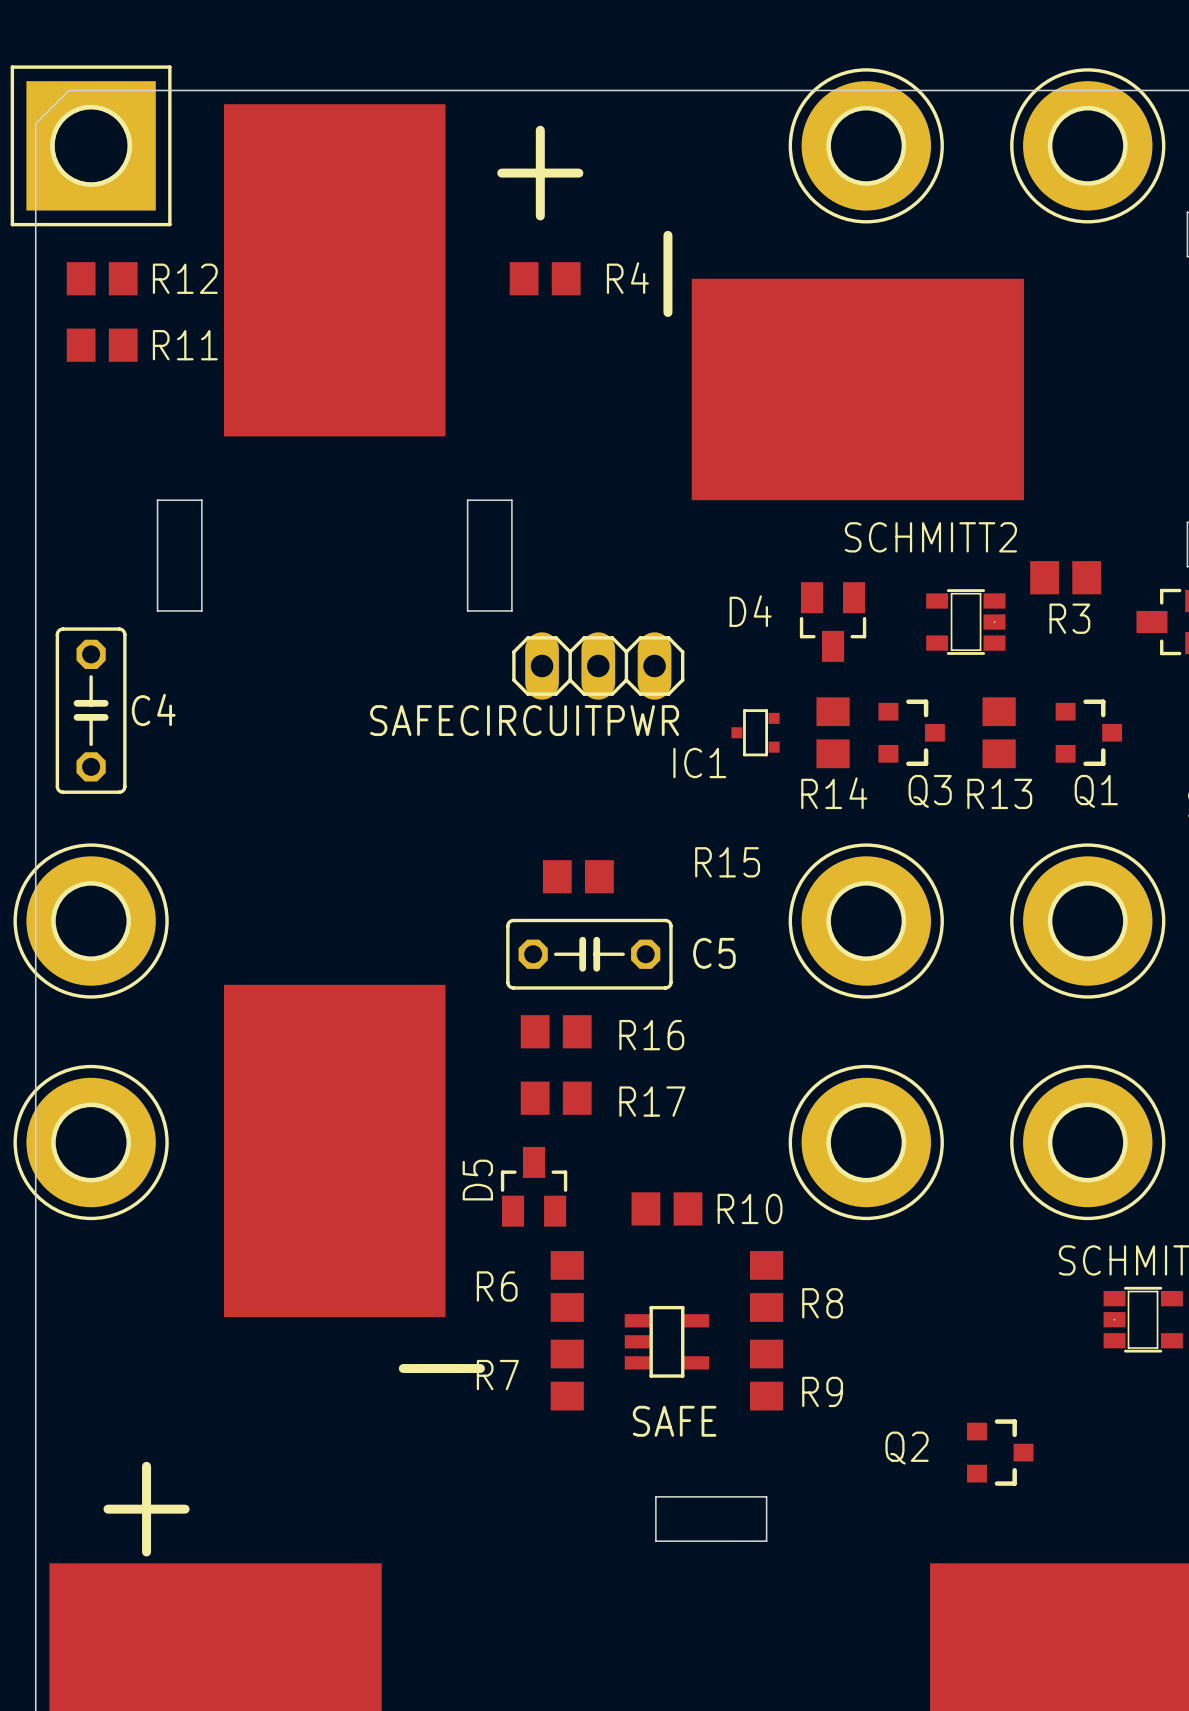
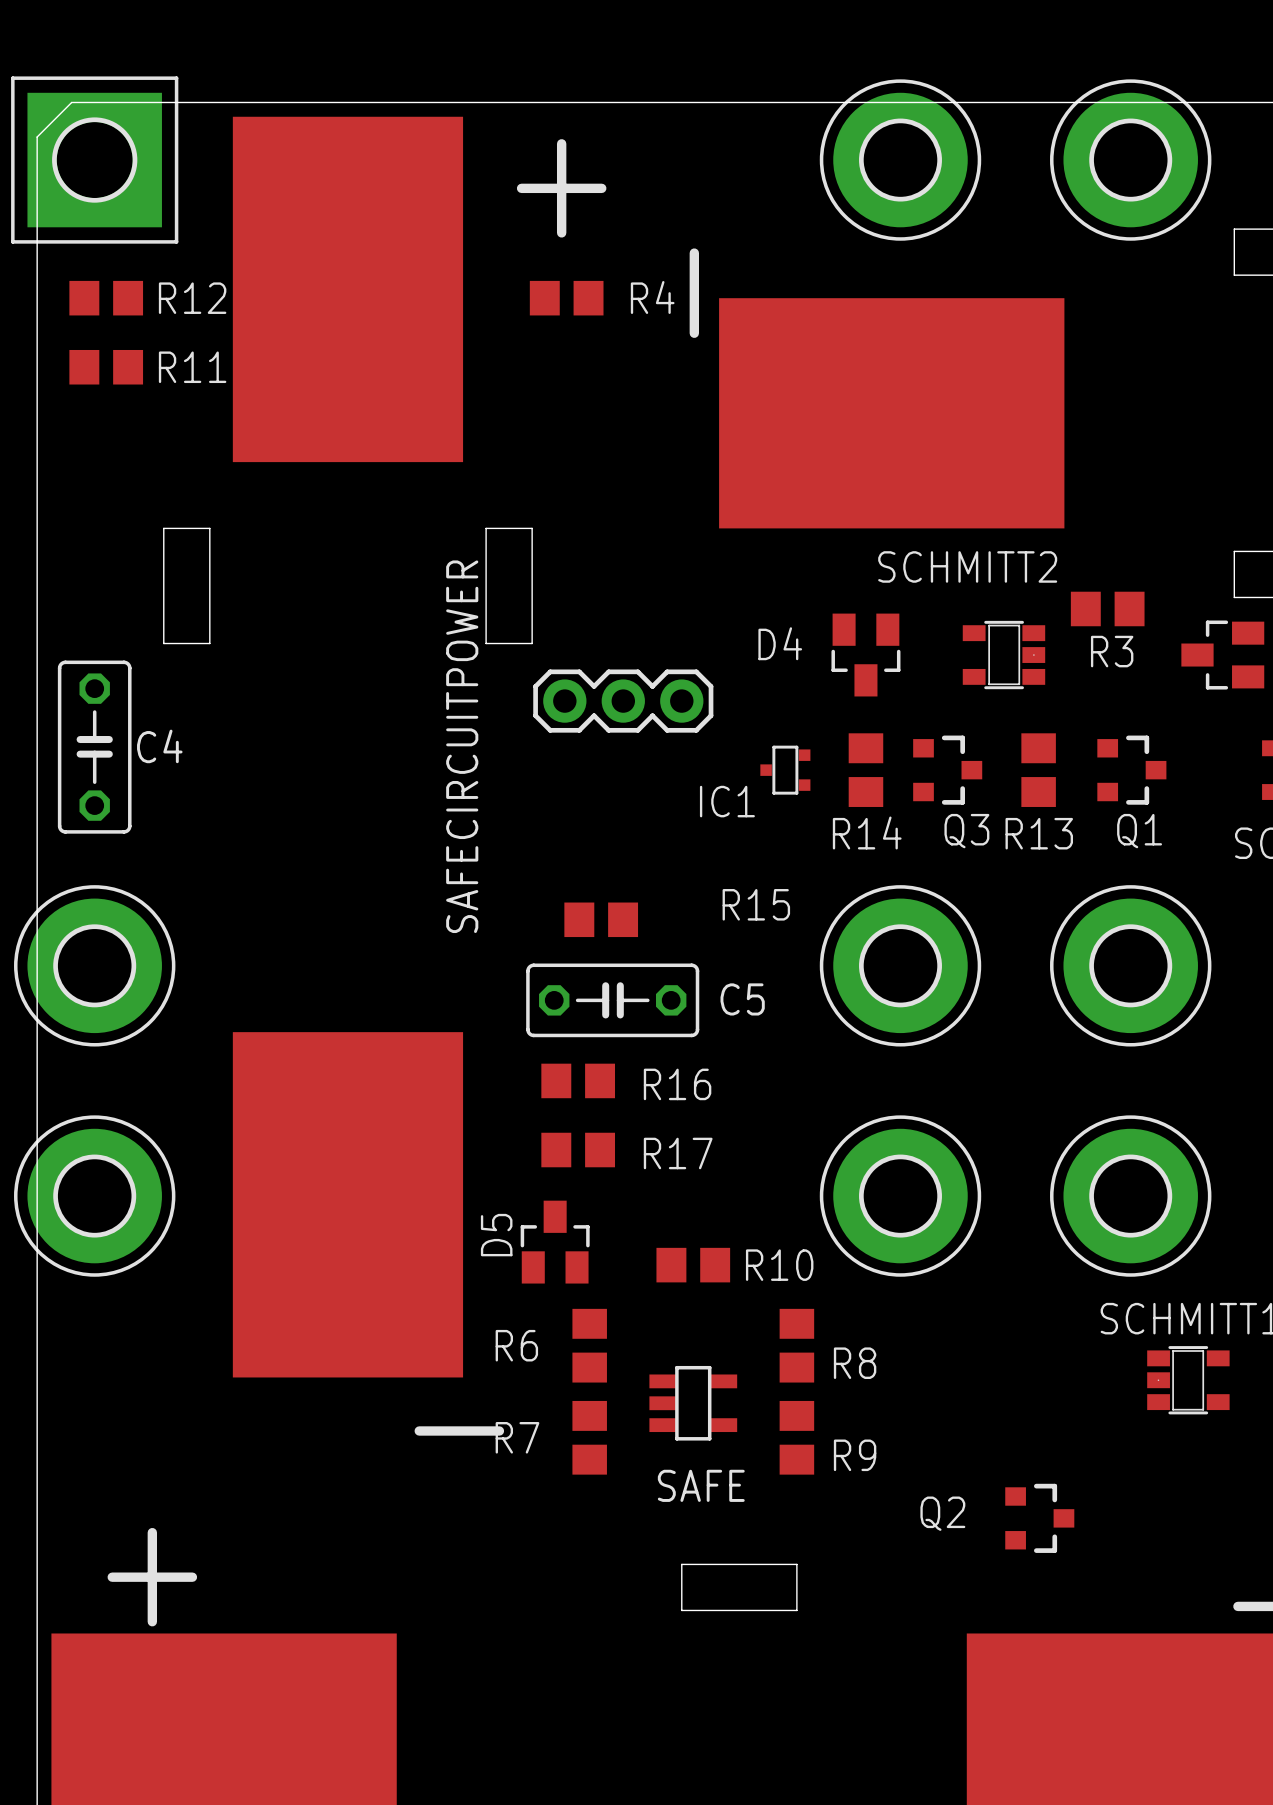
SAFECIRCUITPWR: (598, 665) -> none
SAFECIRCUITPOWER: none -> (623, 701)

